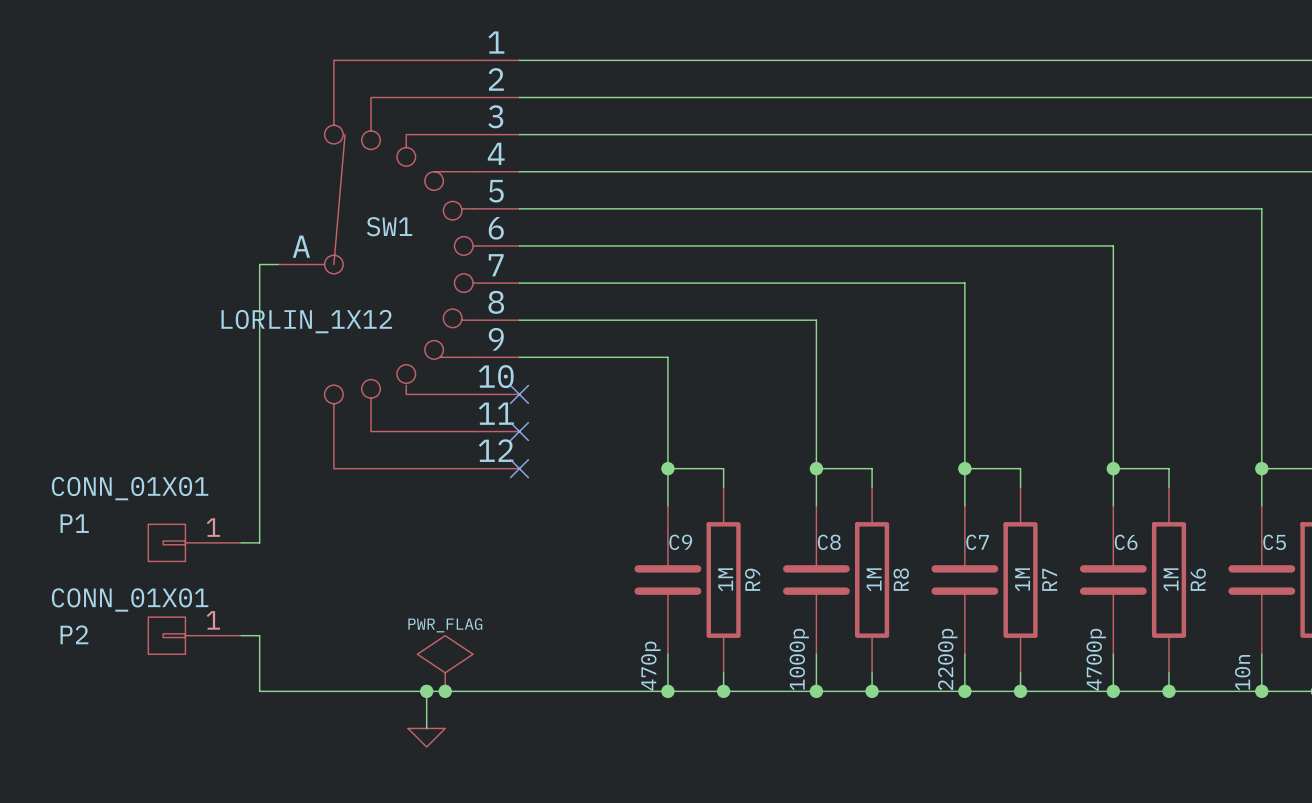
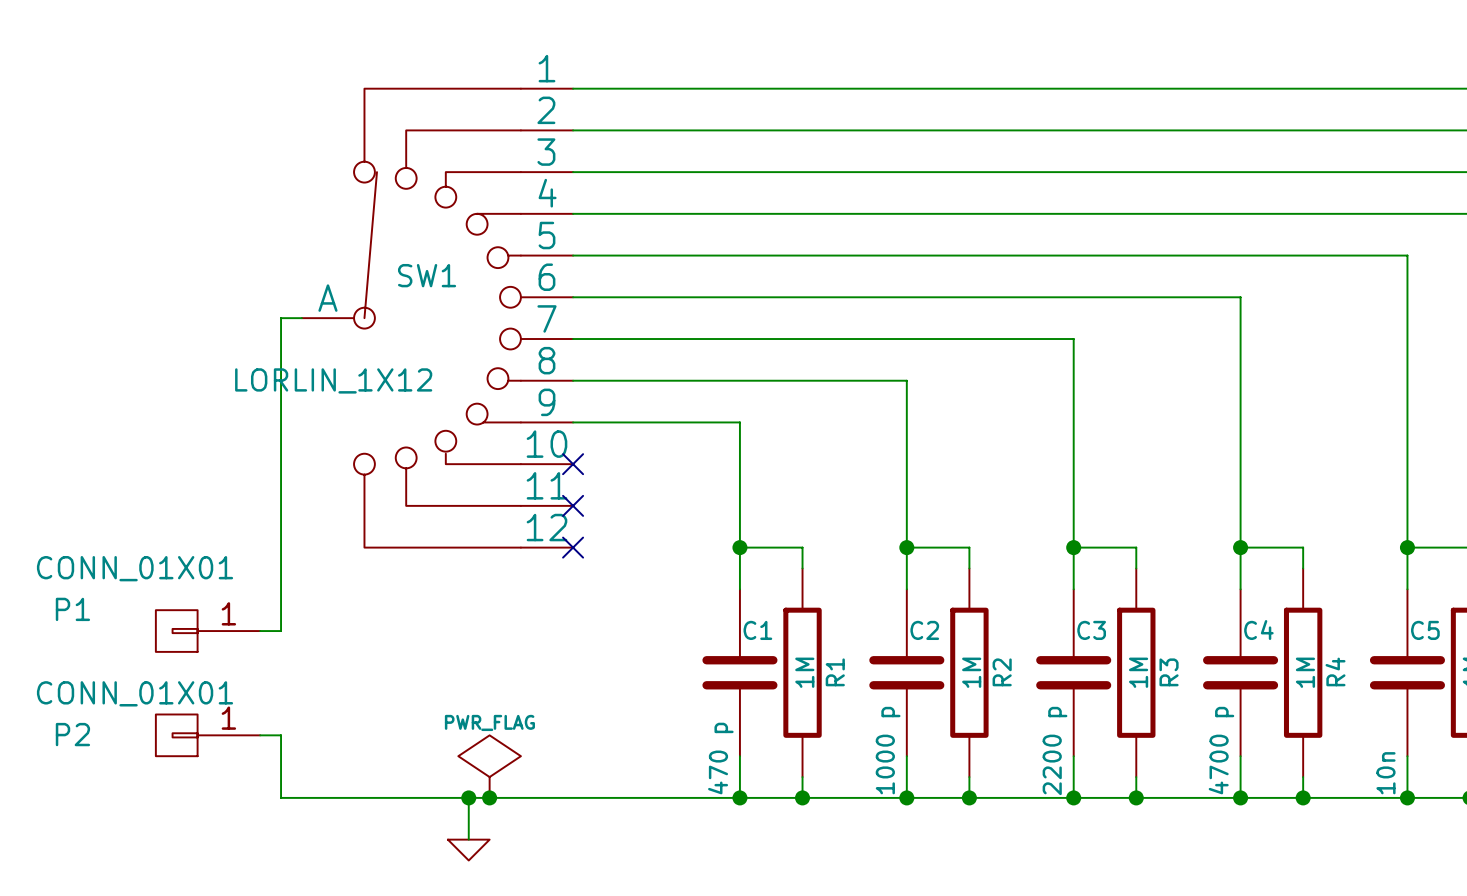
C9 name: C9 (680, 542) -> C1 (757, 630)
C8 name: C8 (829, 542) -> C2 (924, 630)
C7 name: C7 (977, 542) -> C3 (1091, 630)
C6 name: C6 (1126, 542) -> C4 (1258, 630)
R9 name: R9 (752, 579) -> R1 (835, 672)
R8 name: R8 (901, 579) -> R2 (1002, 672)
R7 name: R7 (1049, 579) -> R3 (1169, 672)
R6 name: R6 (1198, 579) -> R4 (1335, 671)
C8 value: 1000p (799, 659) -> 1000 p (888, 750)
C7 value: 2200p (947, 659) -> 2200 p (1055, 750)
C6 value: 4700p (1096, 659) -> 4700 p (1221, 750)
C9 value: 470p (650, 666) -> 470 p (720, 758)

